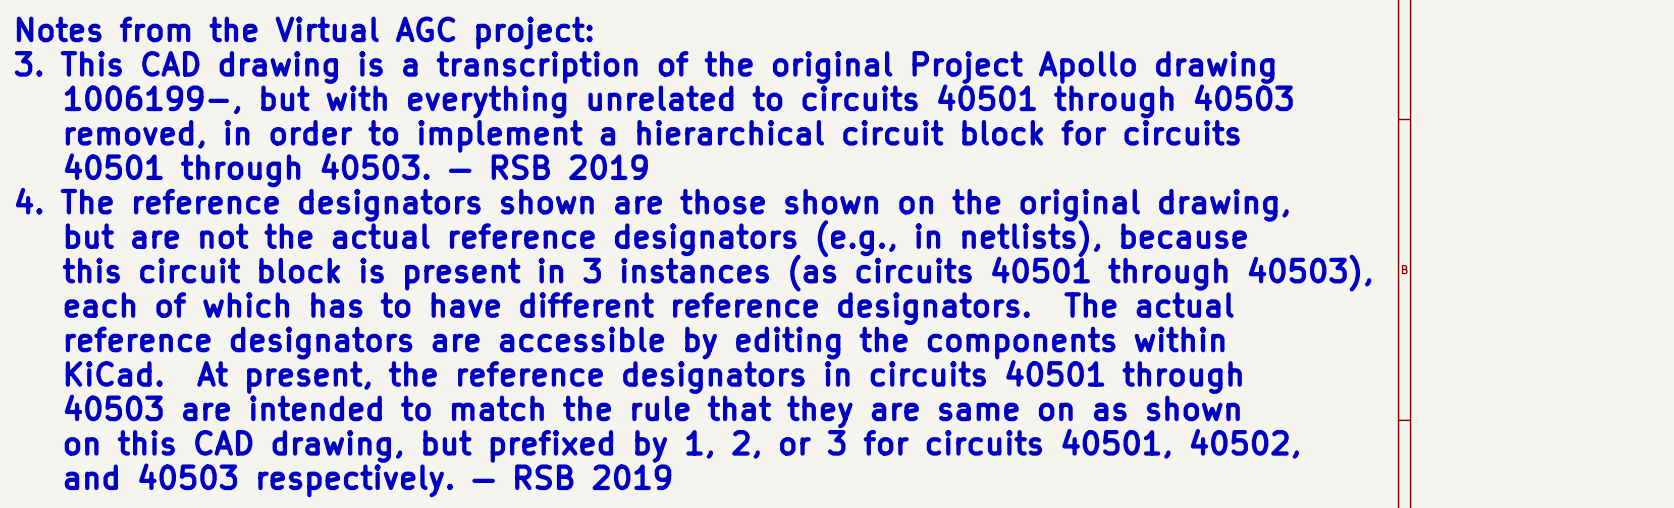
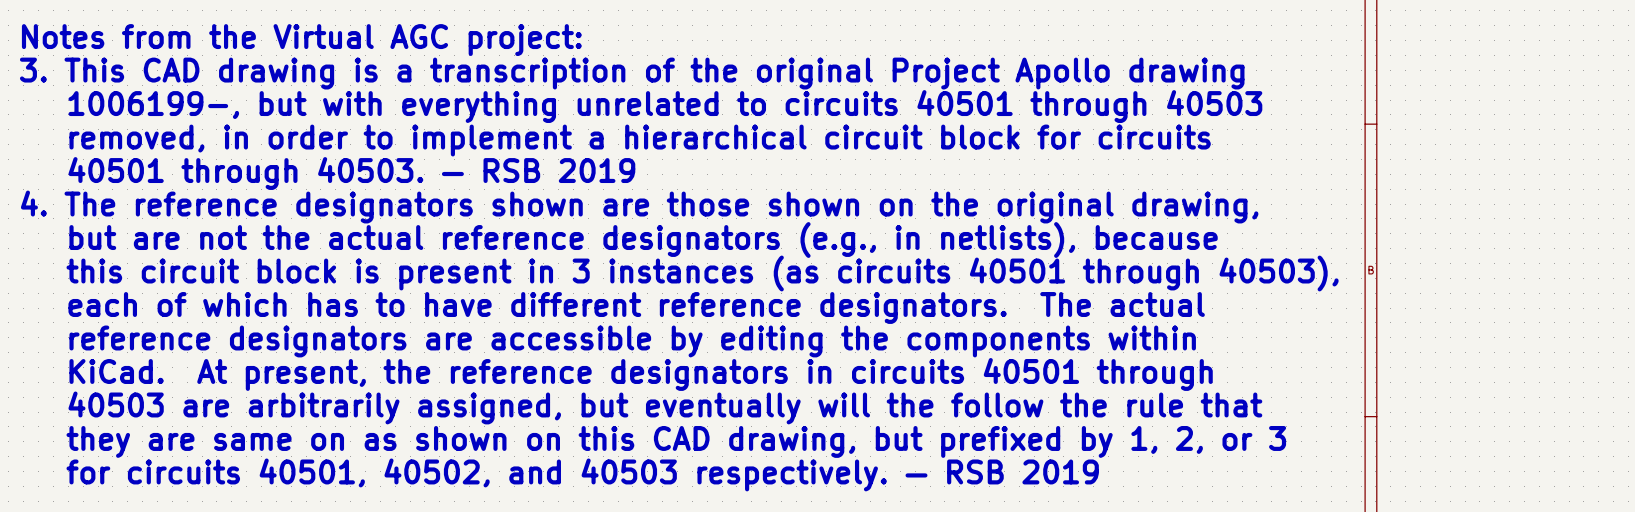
text: 40503 are intended to match the rule that they are same on as shown (652, 411) -> 40503 are arbitrarily assigned, but eventually will the follow the rule that (665, 407)
text: on this CAD drawing, but prefixed by 1, 2, or 3 for circuits 40501, 40502, (681, 445) -> they are same on as shown on this CAD drawing, but prefixed by 1, 2, or 3 (676, 441)
text: and 40503 respectively. — RSB 2019 (367, 480) -> for circuits 40501, 40502, and 40503 respectively. — RSB 2019 (582, 474)

